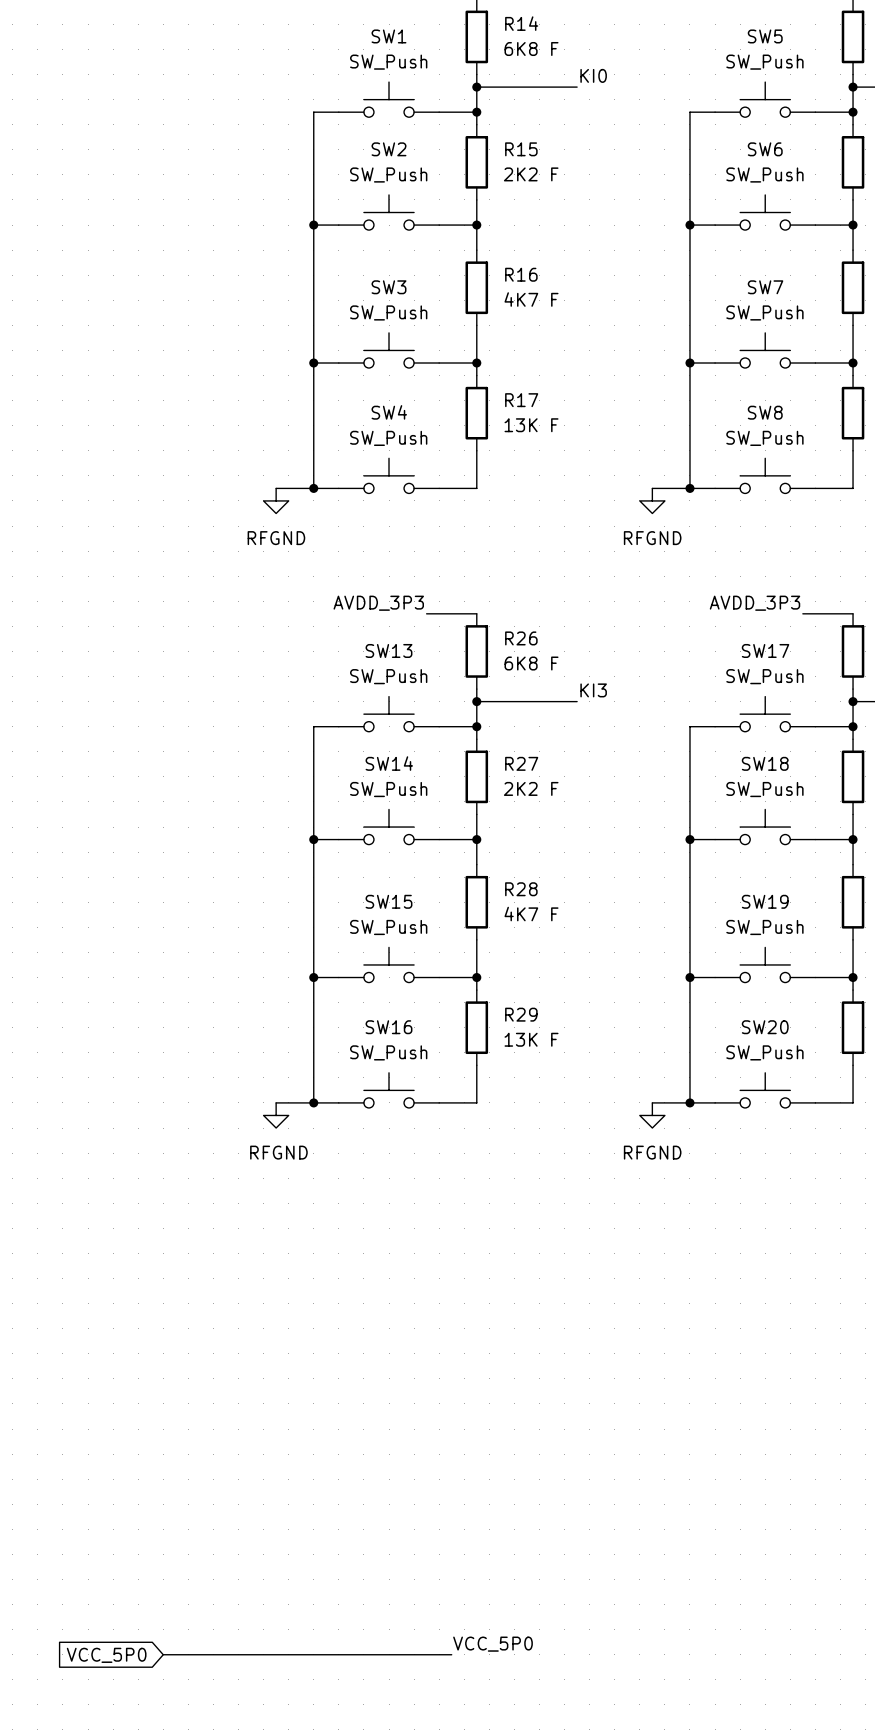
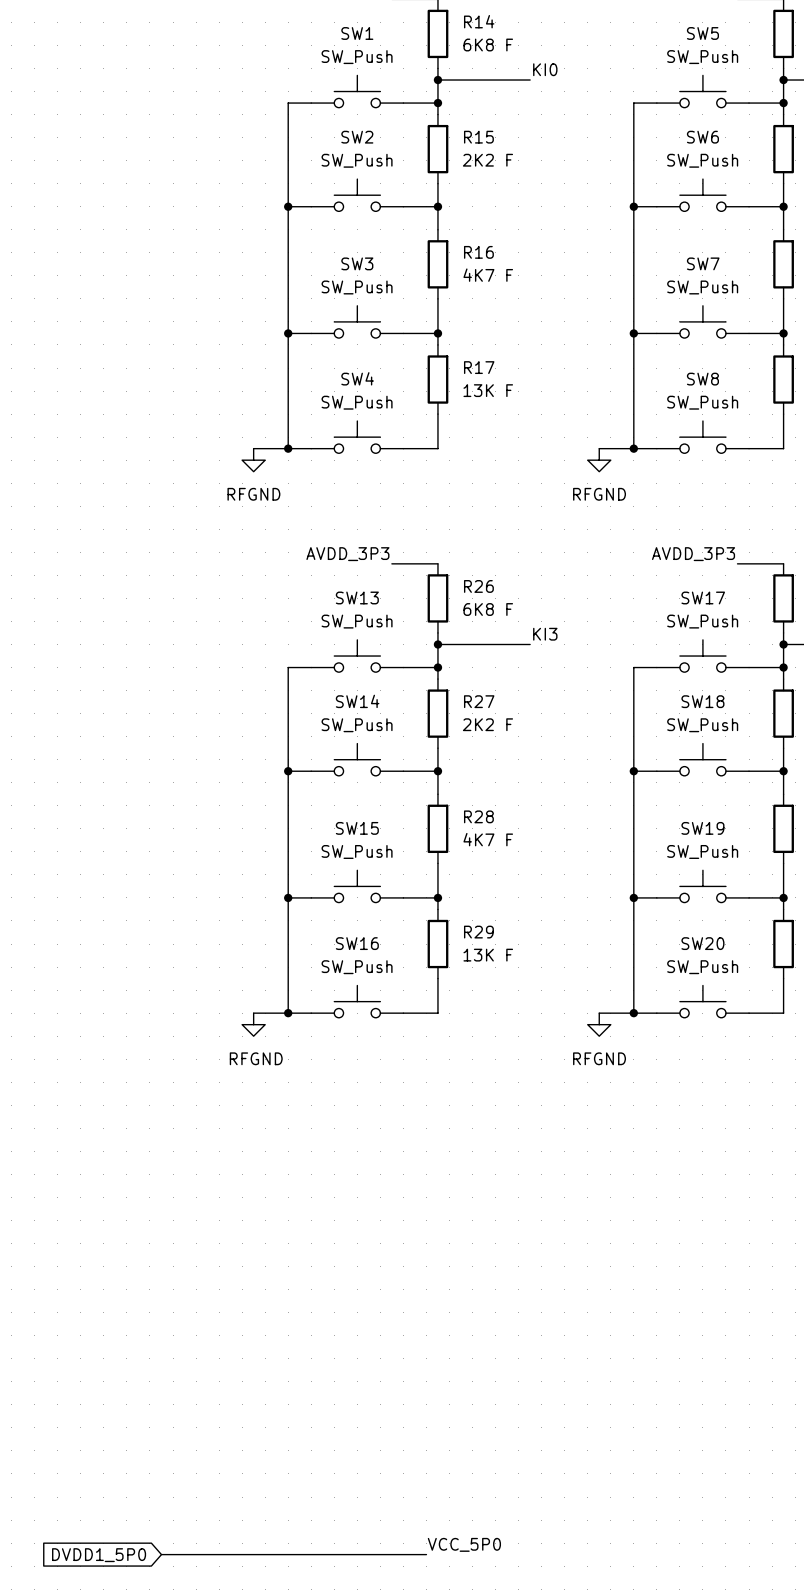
label position: VCC_5P0 (493, 1644) -> VCC_5P0 (464, 1544)
wire: (163, 1654) (451, 1654) -> (161, 1554) (426, 1554)
global label: VCC_5P0 (106, 1655) -> none
global label: none -> DVDD1_5P0 (99, 1555)

